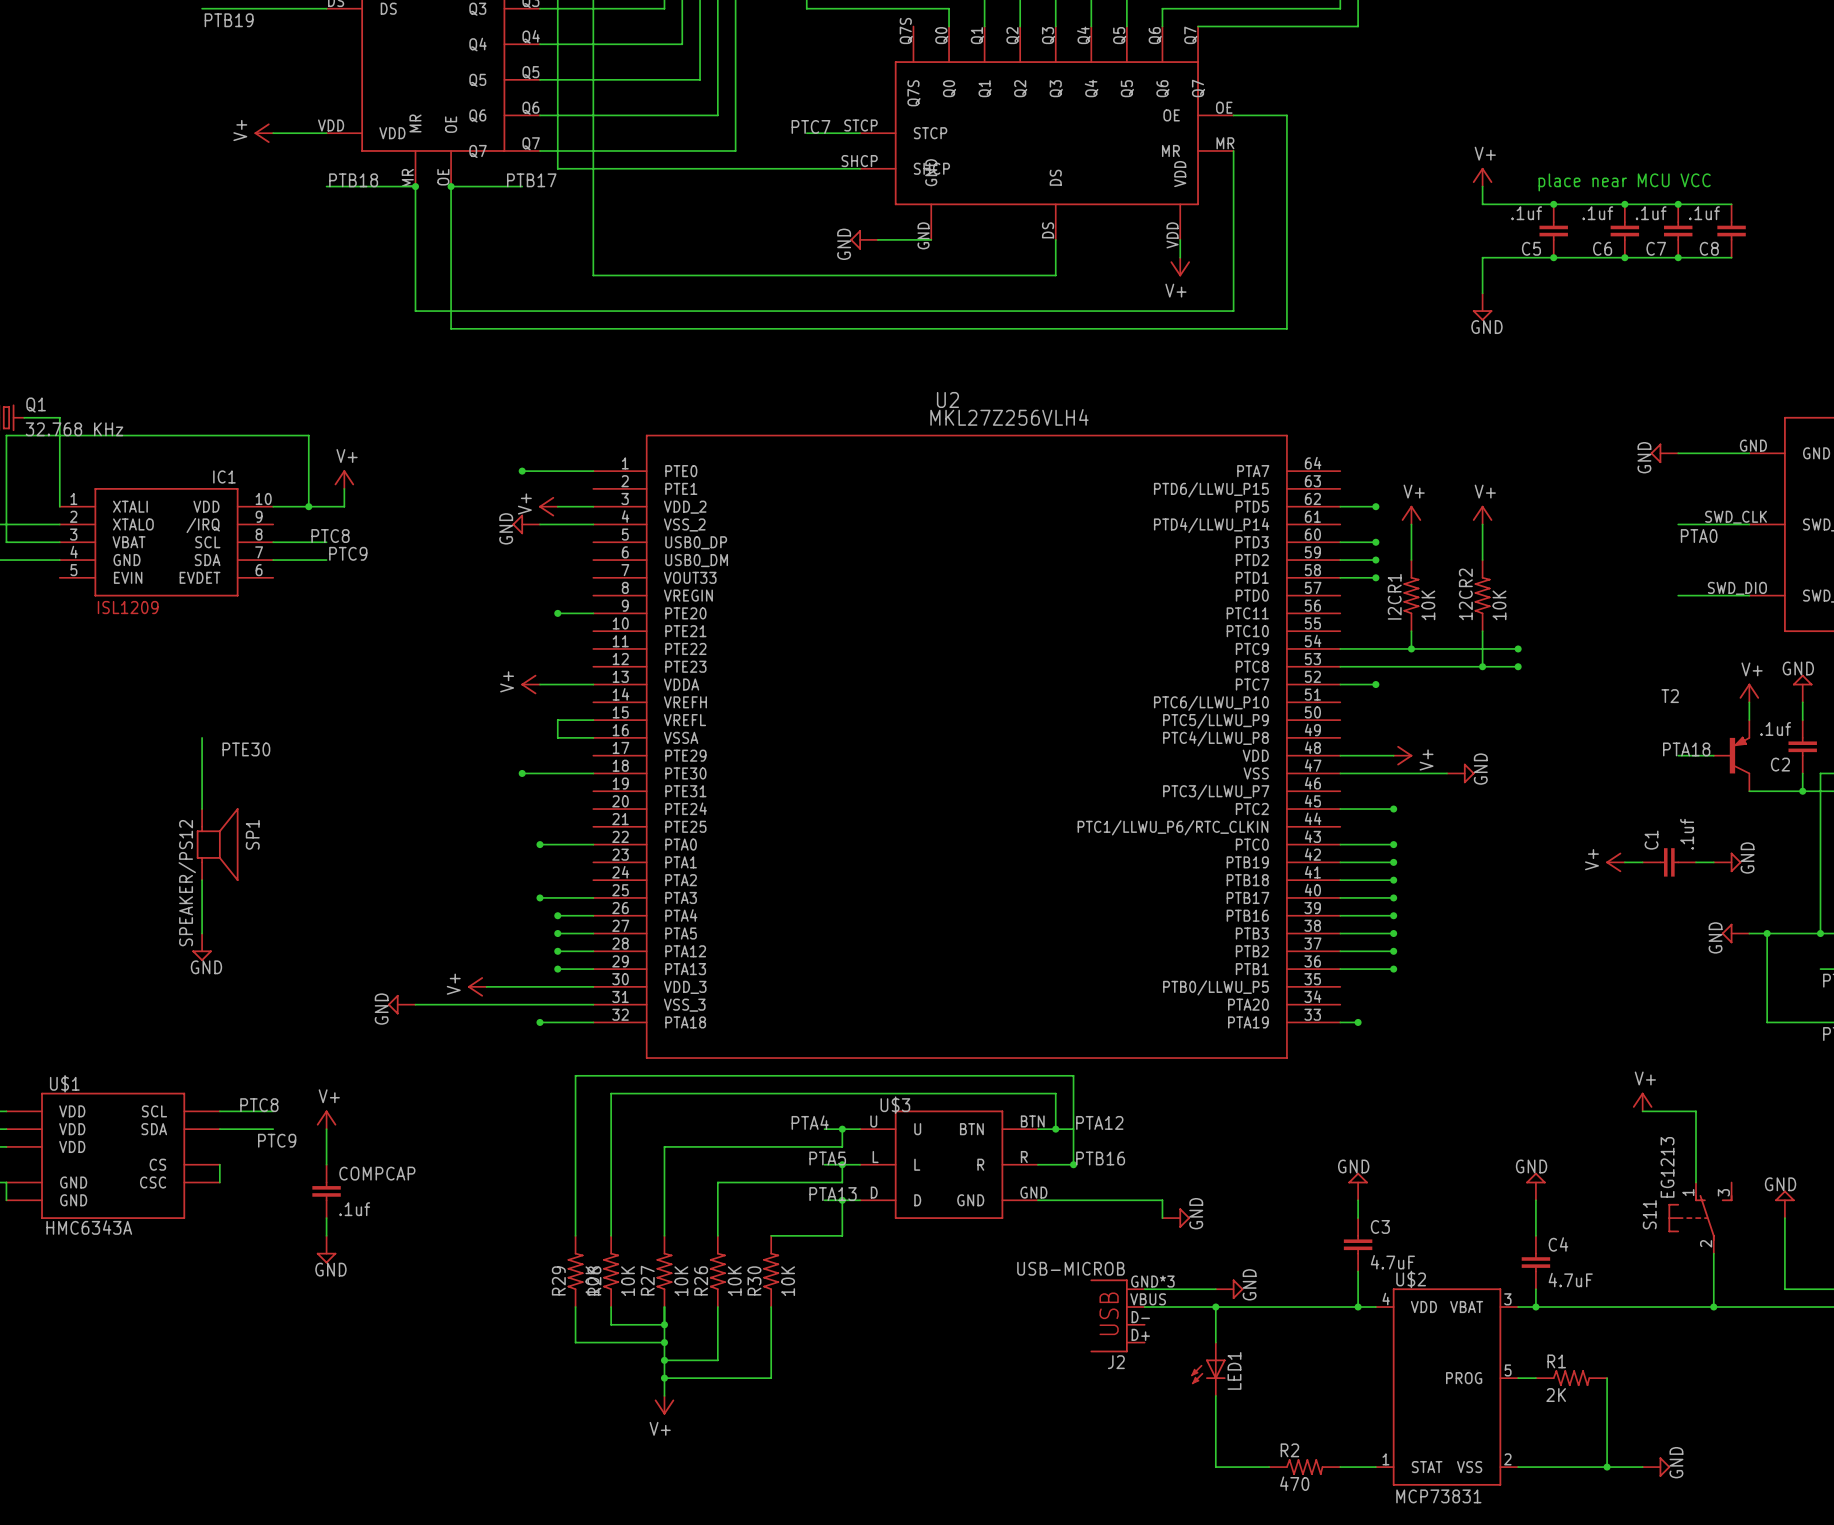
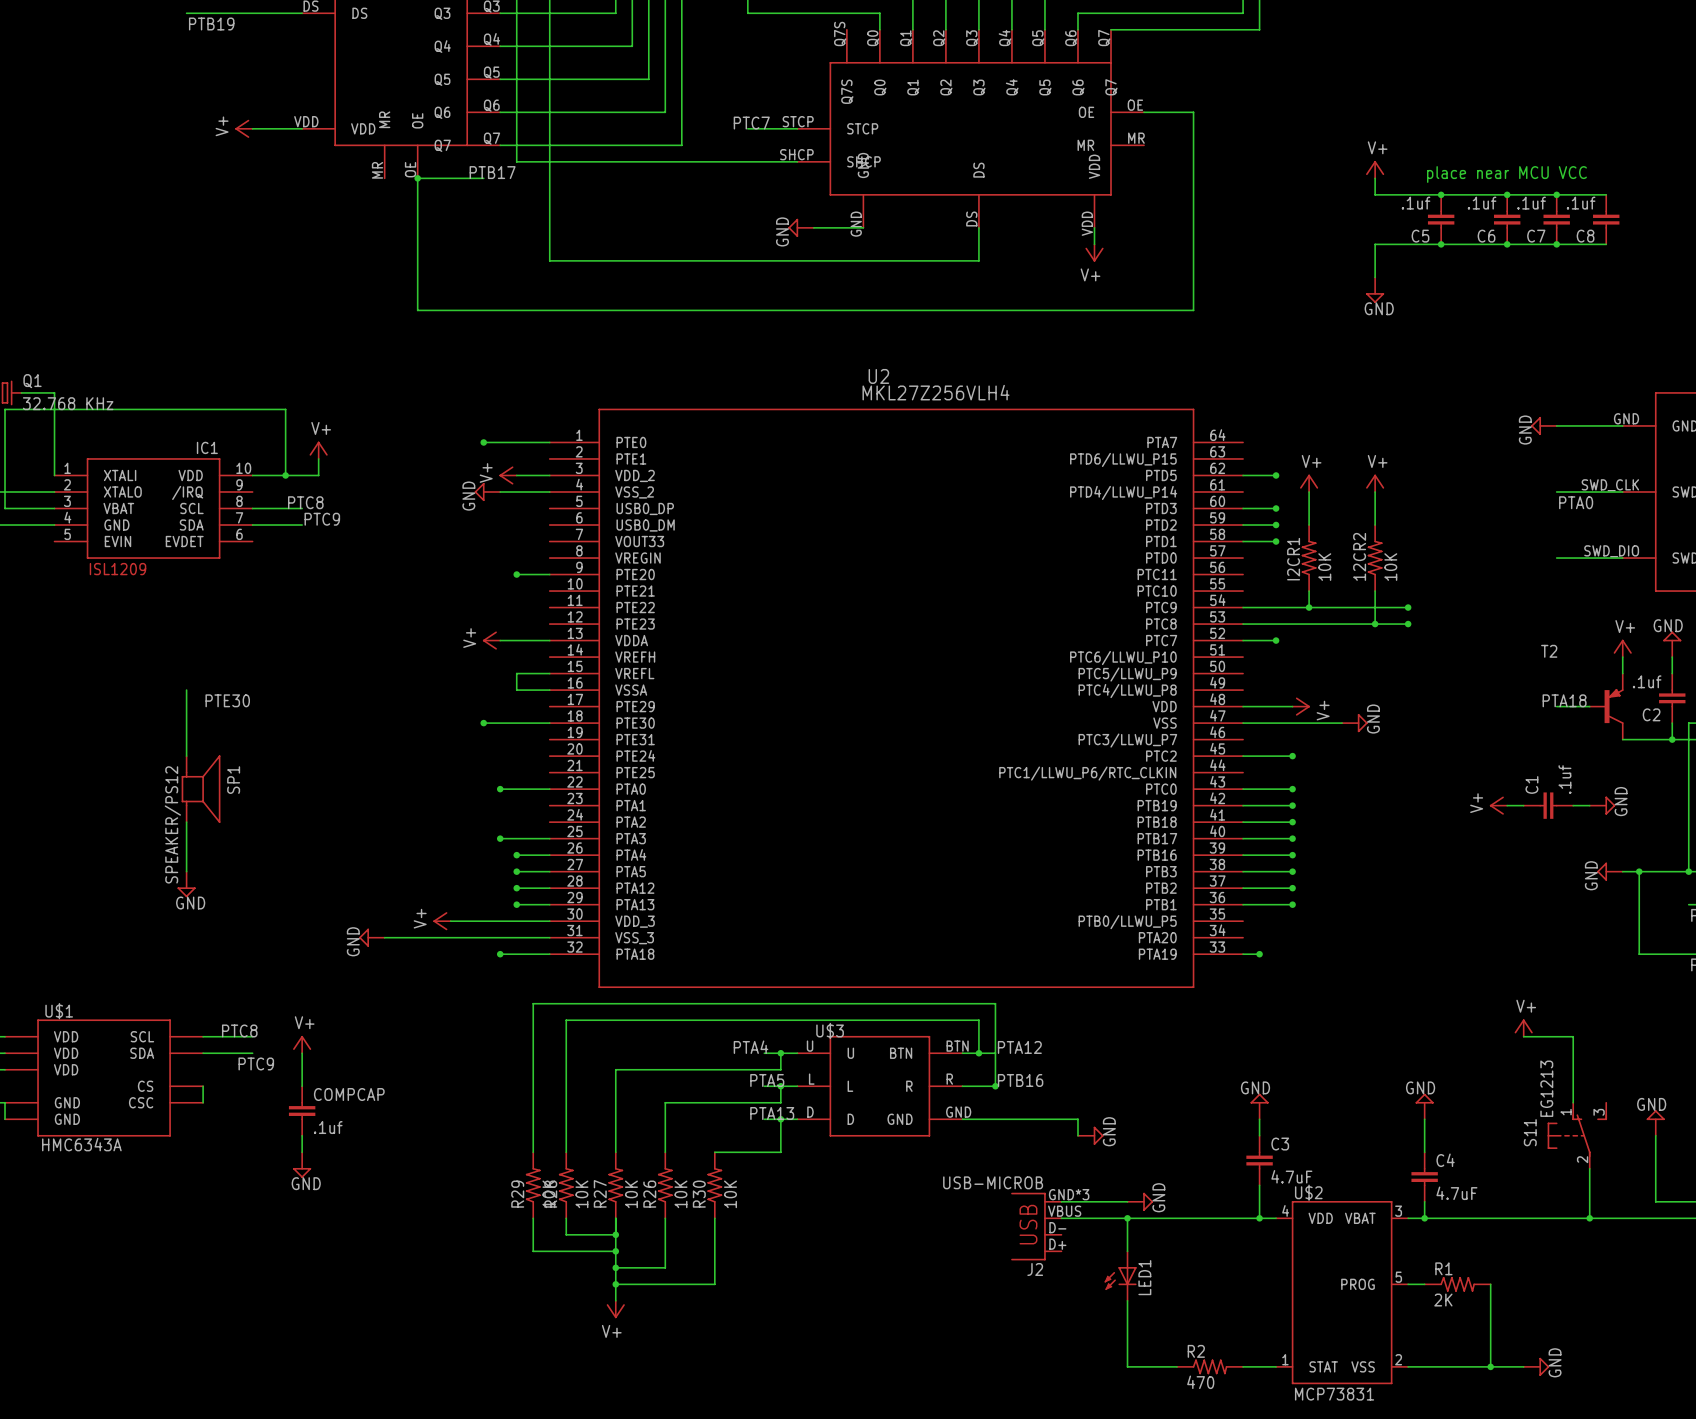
wire: (1233, 150) (1233, 311) (415, 311) (415, 186) (326, 186) -> none
label: PTB18 (353, 180) -> none
junction: (415, 186) -> none

